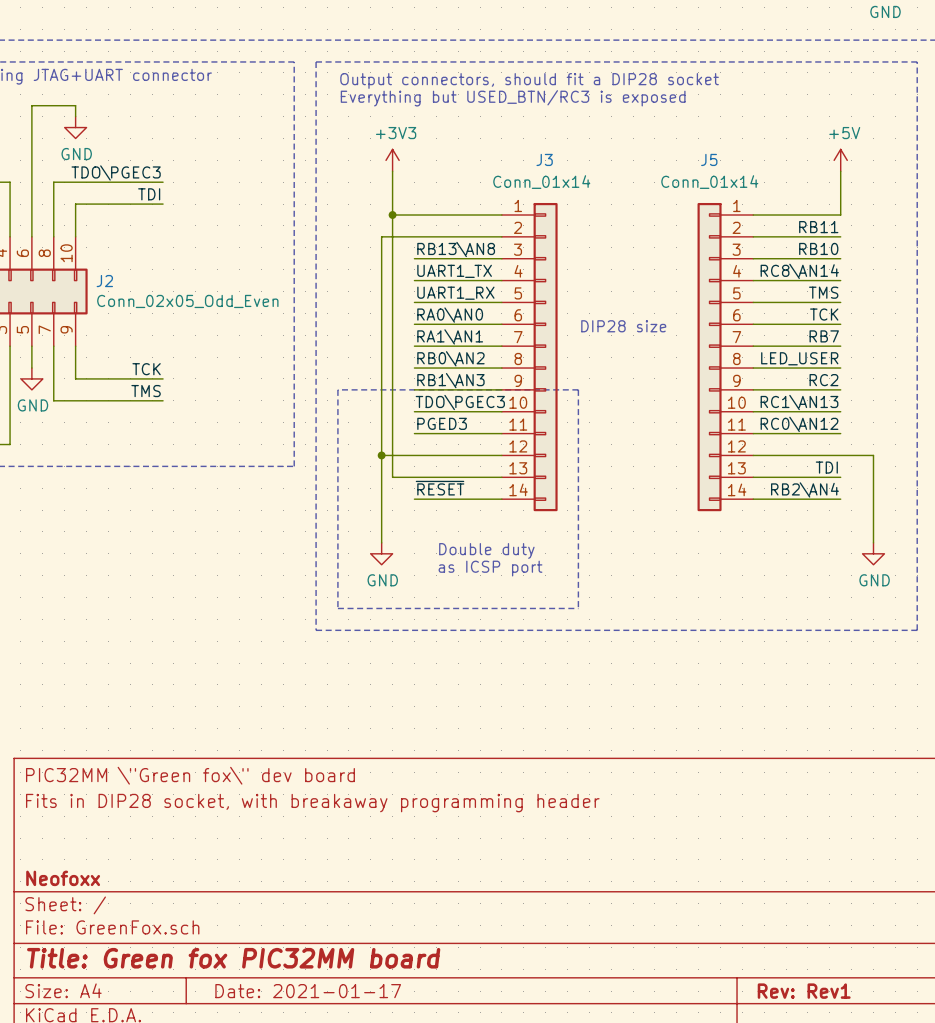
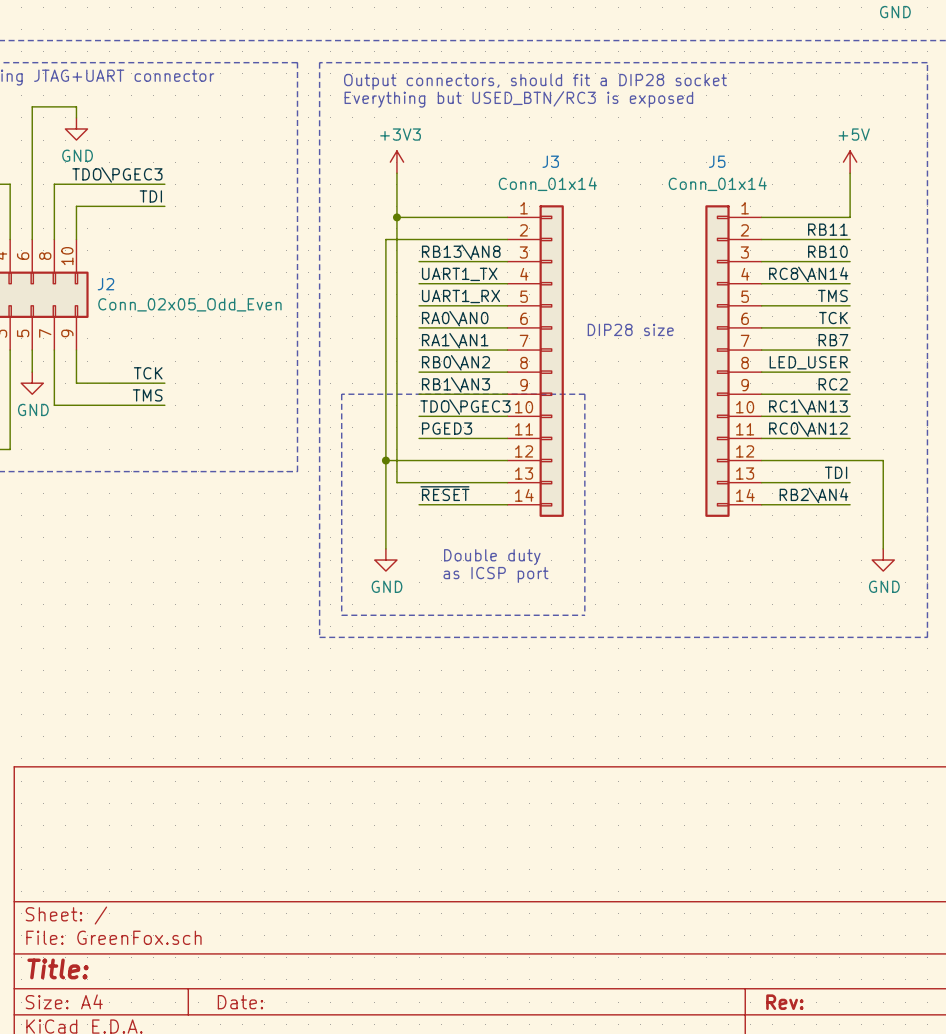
title block: PIC32MM \"Green fox\" dev board (190, 775) -> none
title block: Fits in DIP28 socket, with breakaway programming header (312, 803) -> none
title block: Neofoxx (63, 878) -> none
title block: Title: Green fox PIC32MM board (233, 958) -> Title: (58, 968)
title block: Date: 2021-01-17 (308, 991) -> Date: (240, 1002)
title block: Rev: Rev1 (804, 991) -> Rev: (784, 1002)

